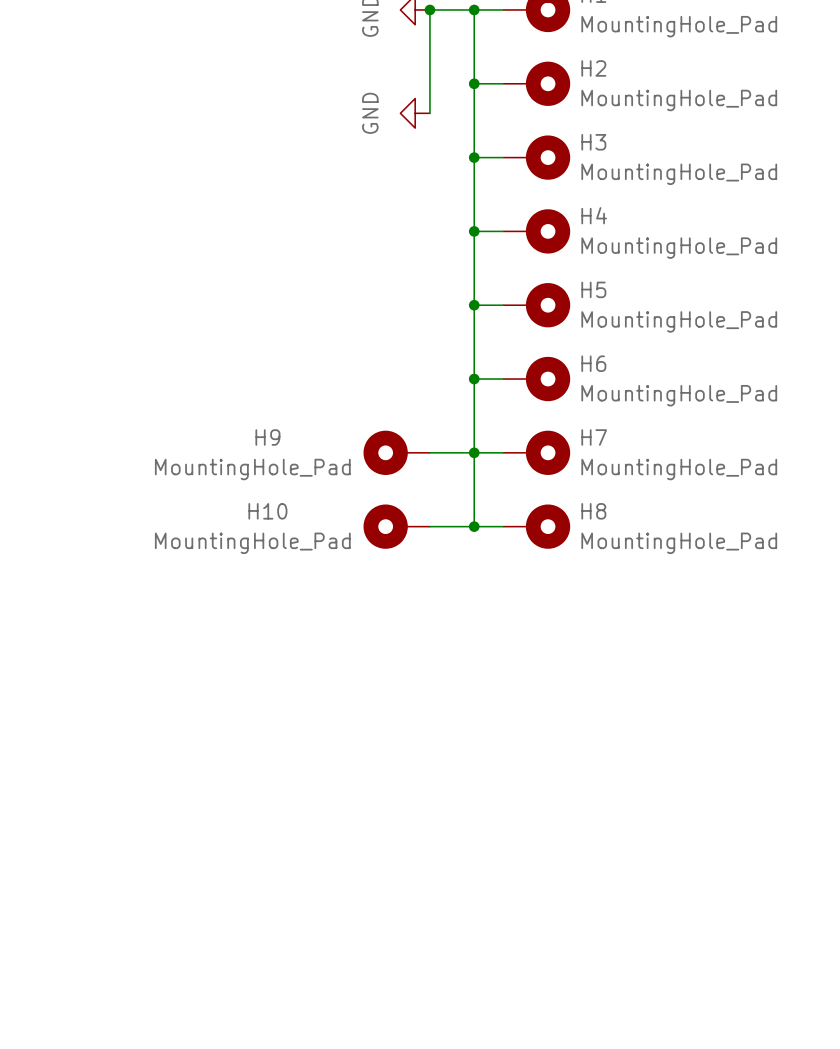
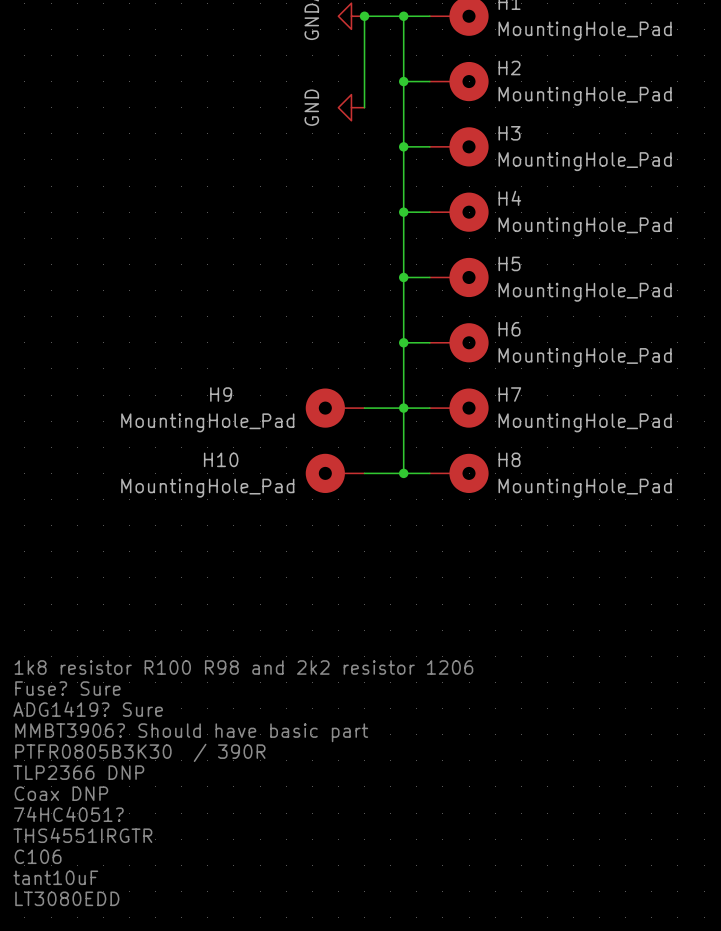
text: none -> 1k8 resistor R100 R98 and 2k2 resistor 1206 (243, 667)
text: none -> Fuse? Sure (67, 688)
text: none -> ADG1419? Sure (88, 709)
text: none -> MMBT3906? Should have basic part (191, 732)
text: none -> PTFR0805B3K30 / 390R (140, 752)
text: none -> TLP2366 DNP (78, 772)
text: none -> Coax DNP (61, 793)
text: none -> 74HC4051? (68, 814)
text: none -> THS4551IRGTR (82, 835)
text: none -> C106 (38, 856)
text: none -> tant10uF (55, 877)
text: none -> LT3080EDD (67, 898)

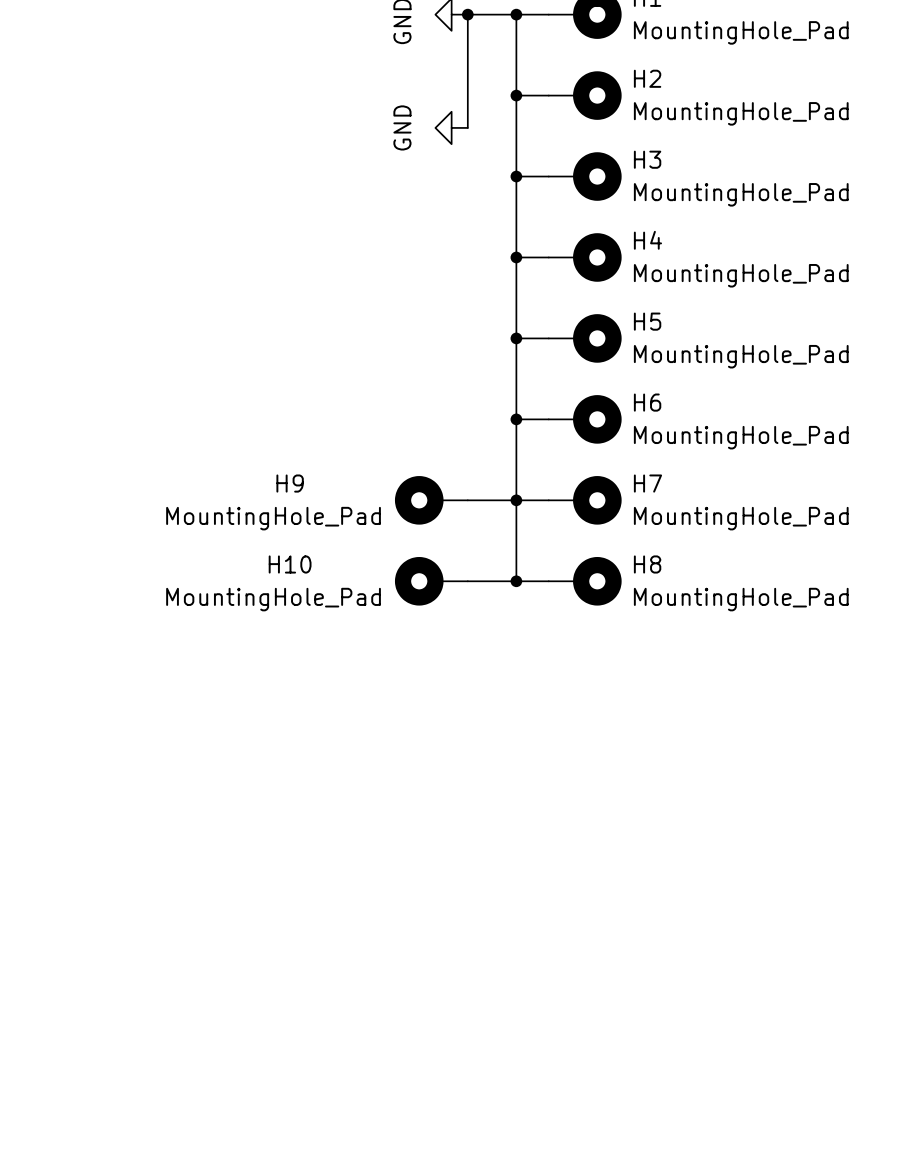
text: 1k8 resistor R100 R98 and 2k2 resistor 1206 (243, 667) -> none
text: Fuse? Sure (67, 688) -> none
text: ADG1419? Sure (88, 709) -> none
text: MMBT3906? Should have basic part (191, 732) -> none
text: PTFR0805B3K30 / 390R (140, 752) -> none
text: TLP2366 DNP (78, 772) -> none
text: Coax DNP (61, 793) -> none
text: 74HC4051? (68, 814) -> none
text: THS4551IRGTR (82, 835) -> none
text: C106 (38, 856) -> none
text: tant10uF (55, 877) -> none
text: LT3080EDD (67, 898) -> none

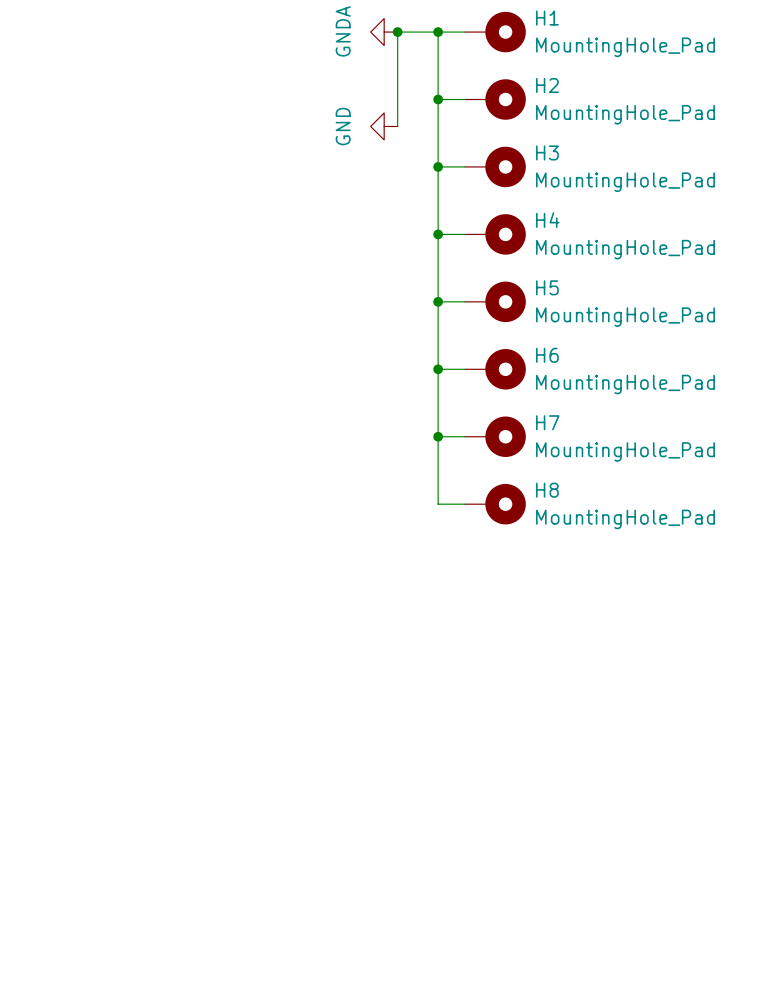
H9: MountingHole_Pad (431, 500) -> none
wire: (467, 500) (516, 500) -> none
H10: MountingHole_Pad (431, 581) -> none
wire: (467, 581) (516, 581) -> none
junction: (516, 581) -> none

